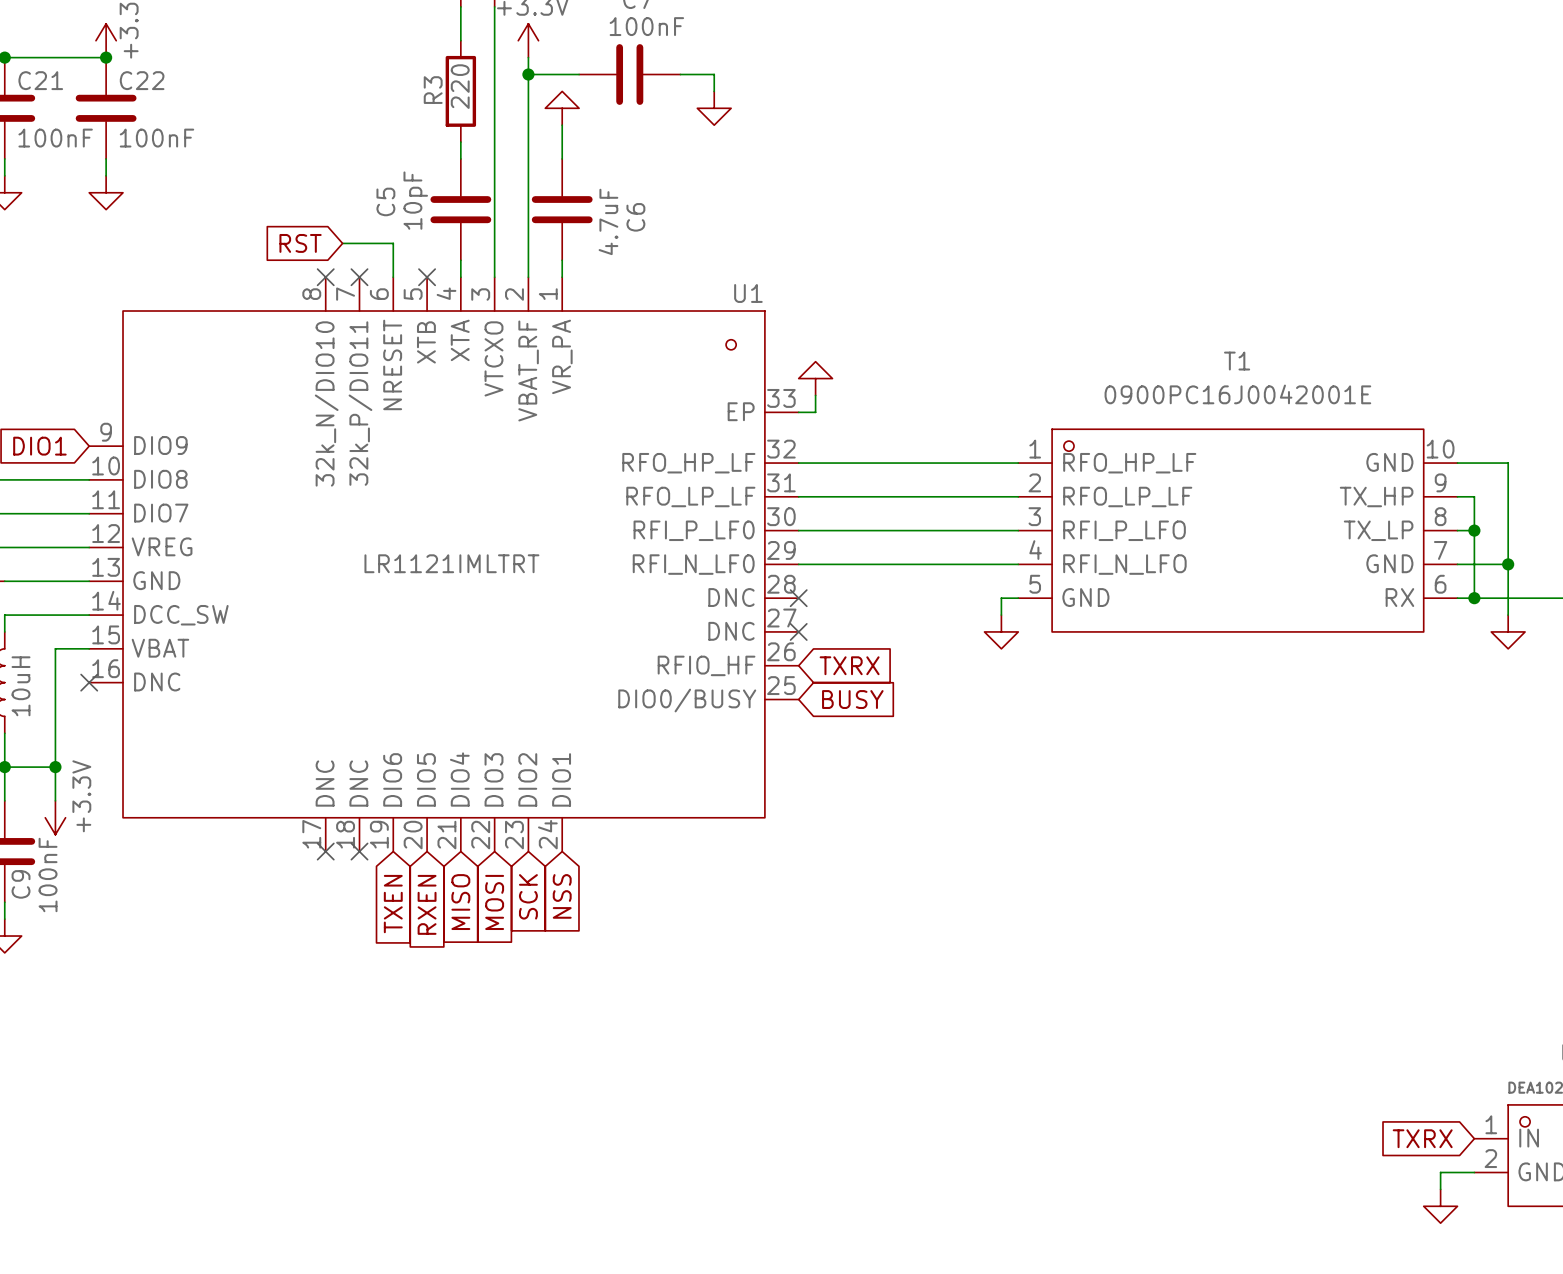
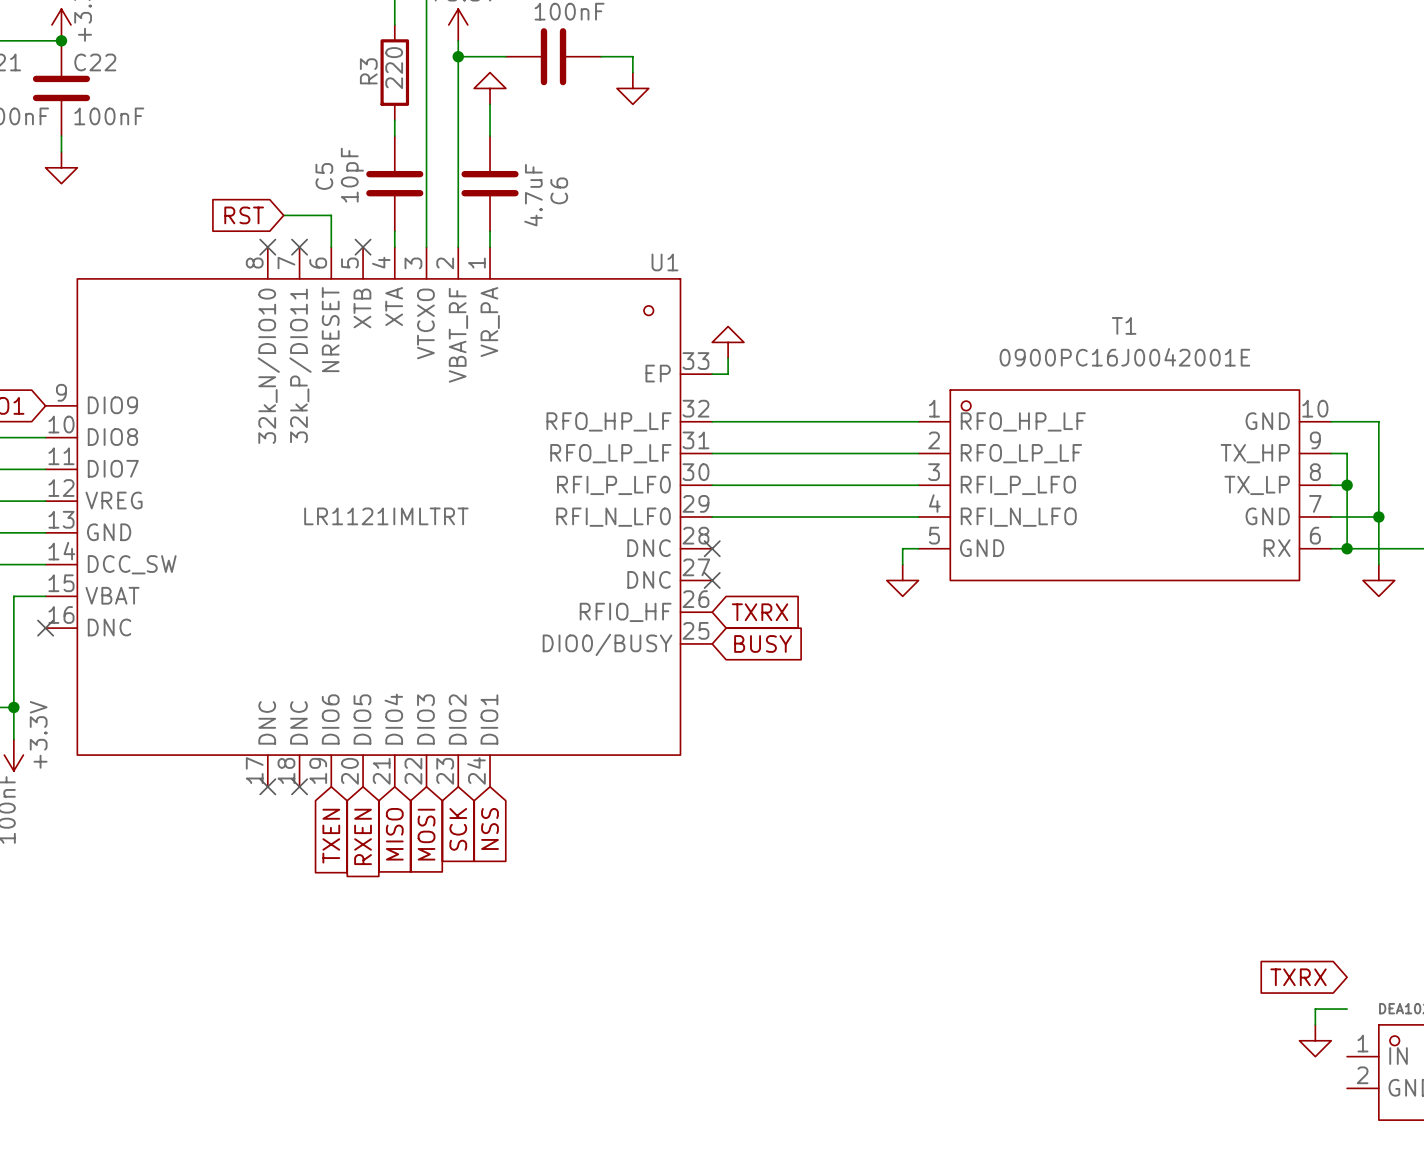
global label position: TXRX (1422, 1138) -> TXRX (1298, 977)
wire: (1474, 1172) (1440, 1172) (1440, 1189) -> (1347, 1009) (1315, 1009) (1315, 1024)
power symbol position: (1440, 1206) -> (1315, 1040)

